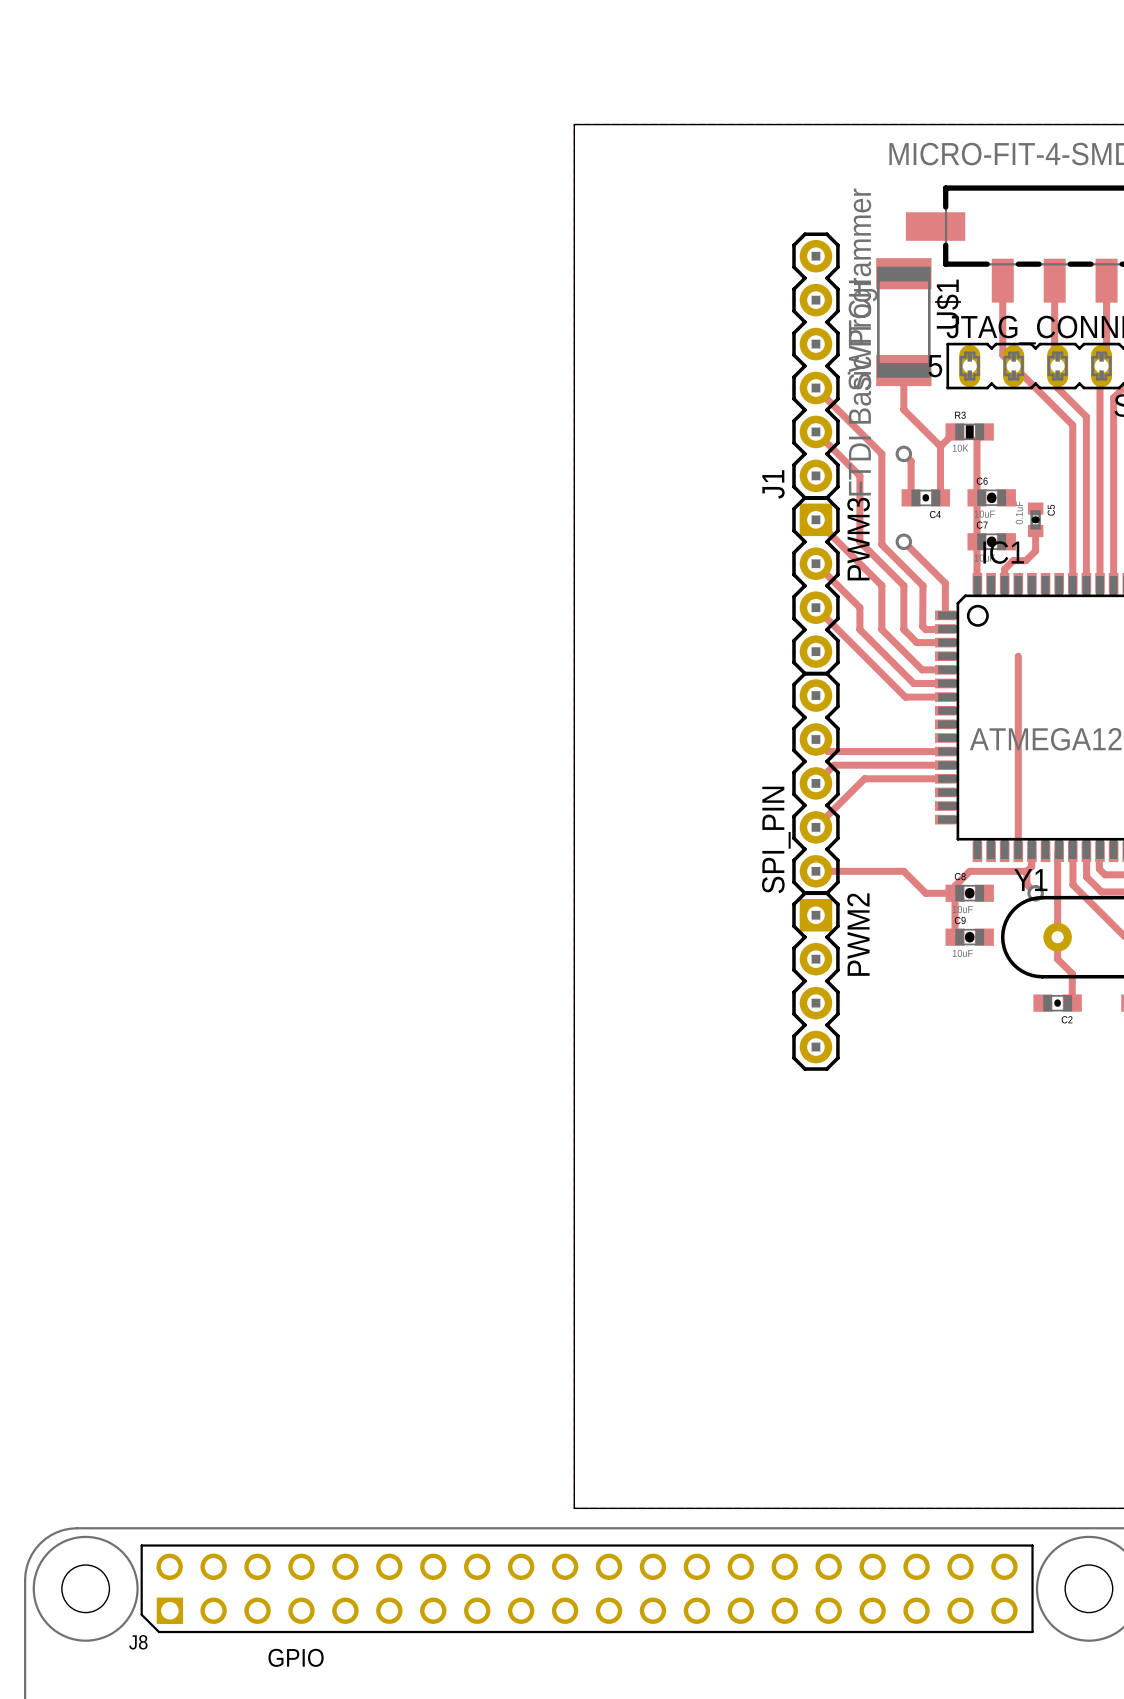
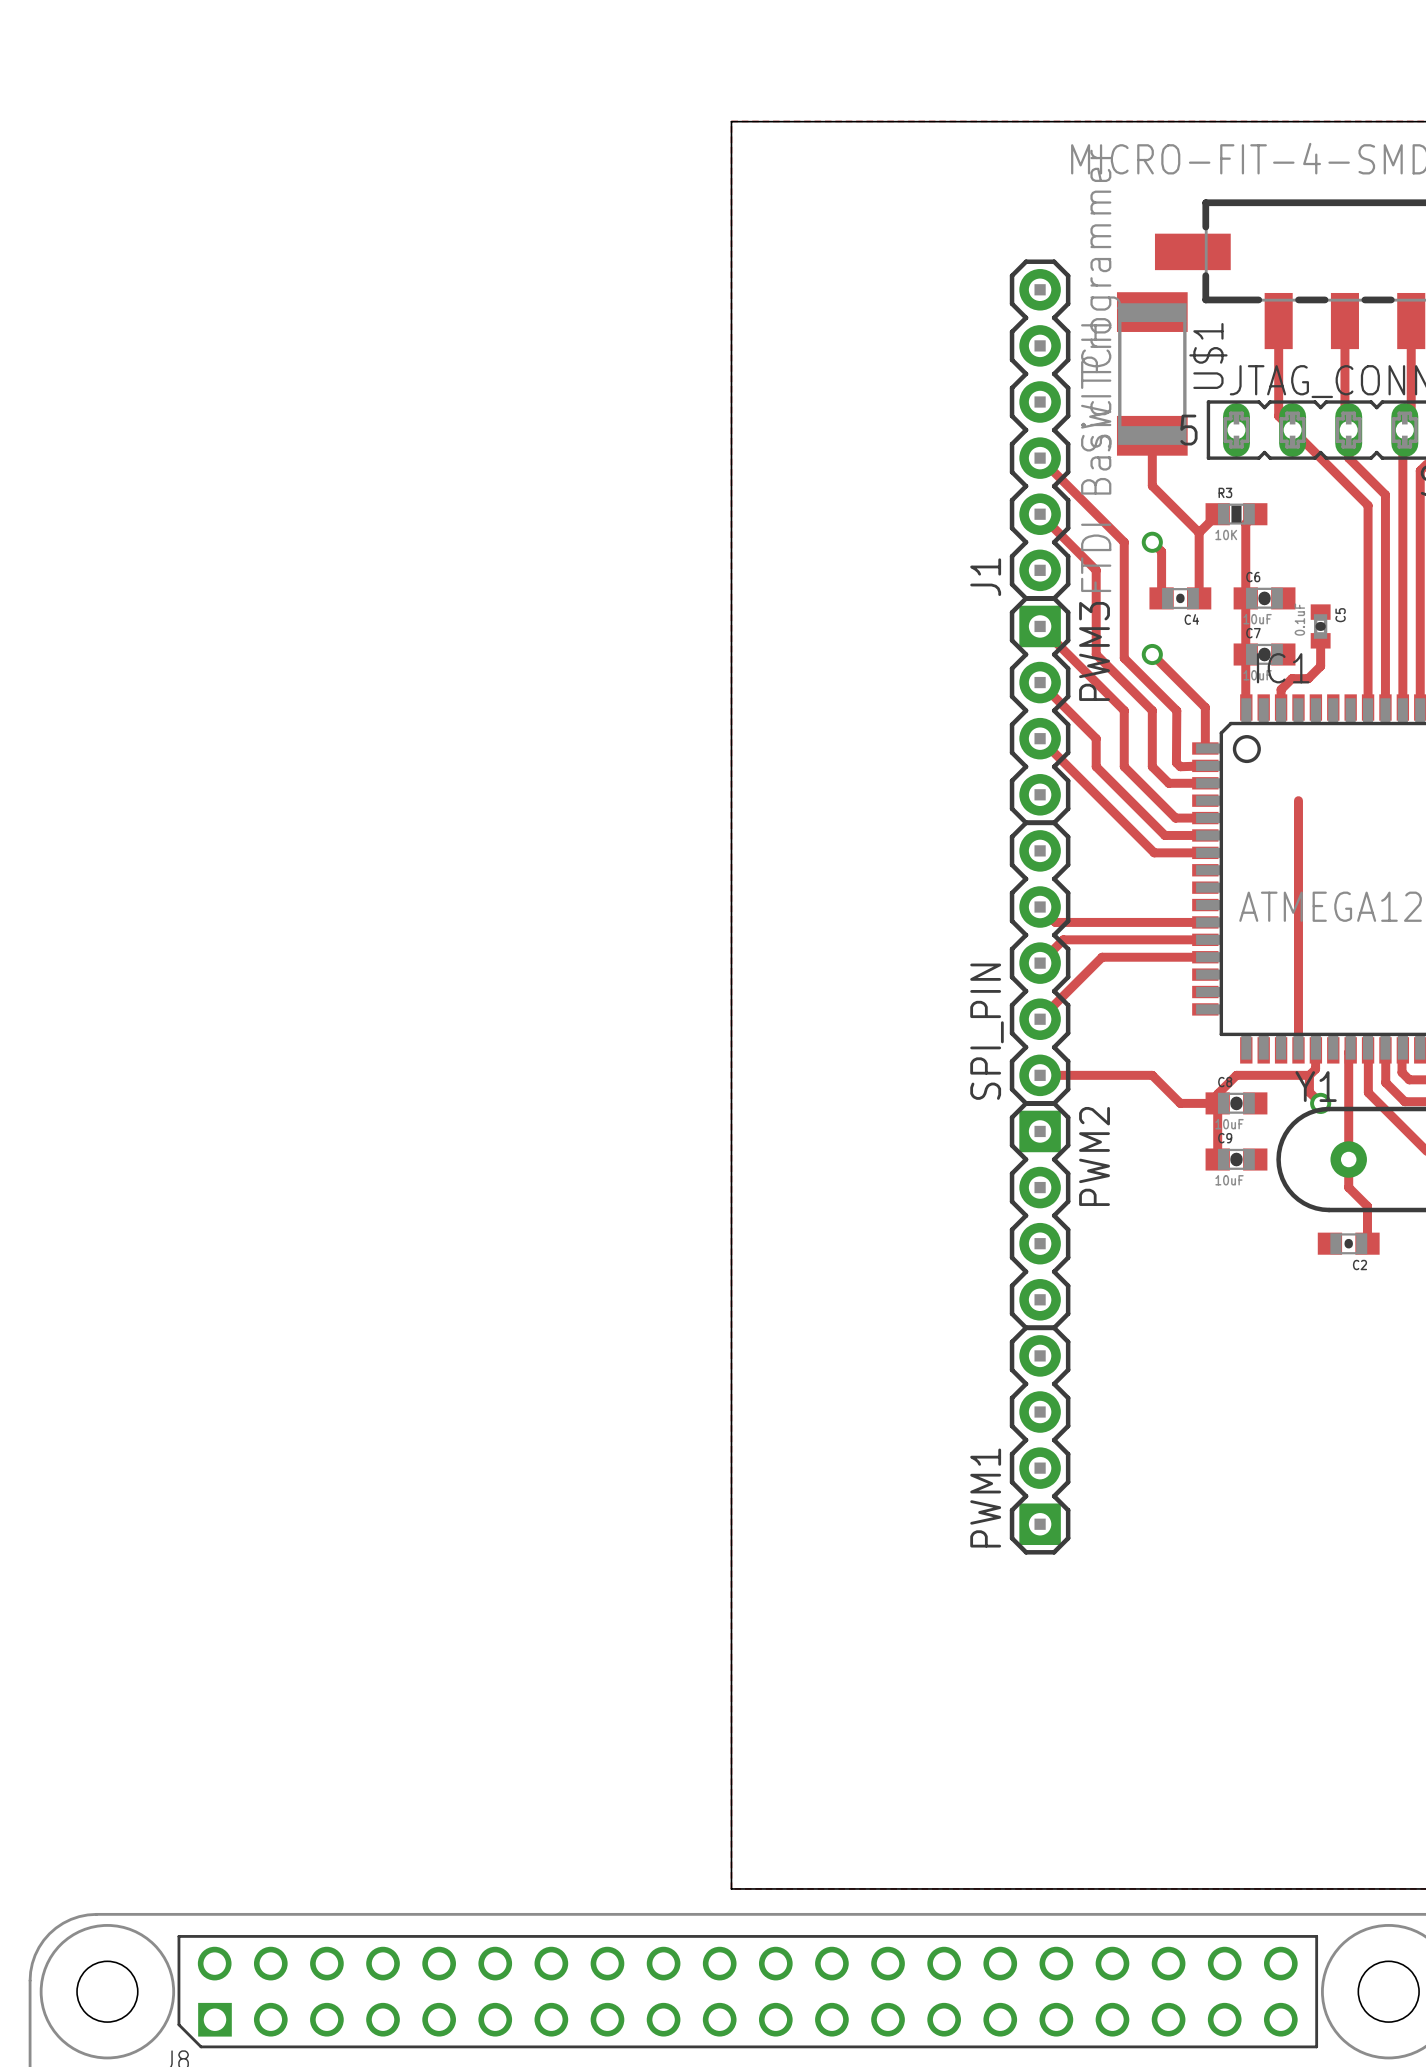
PWM1: none -> (1040, 1440)

